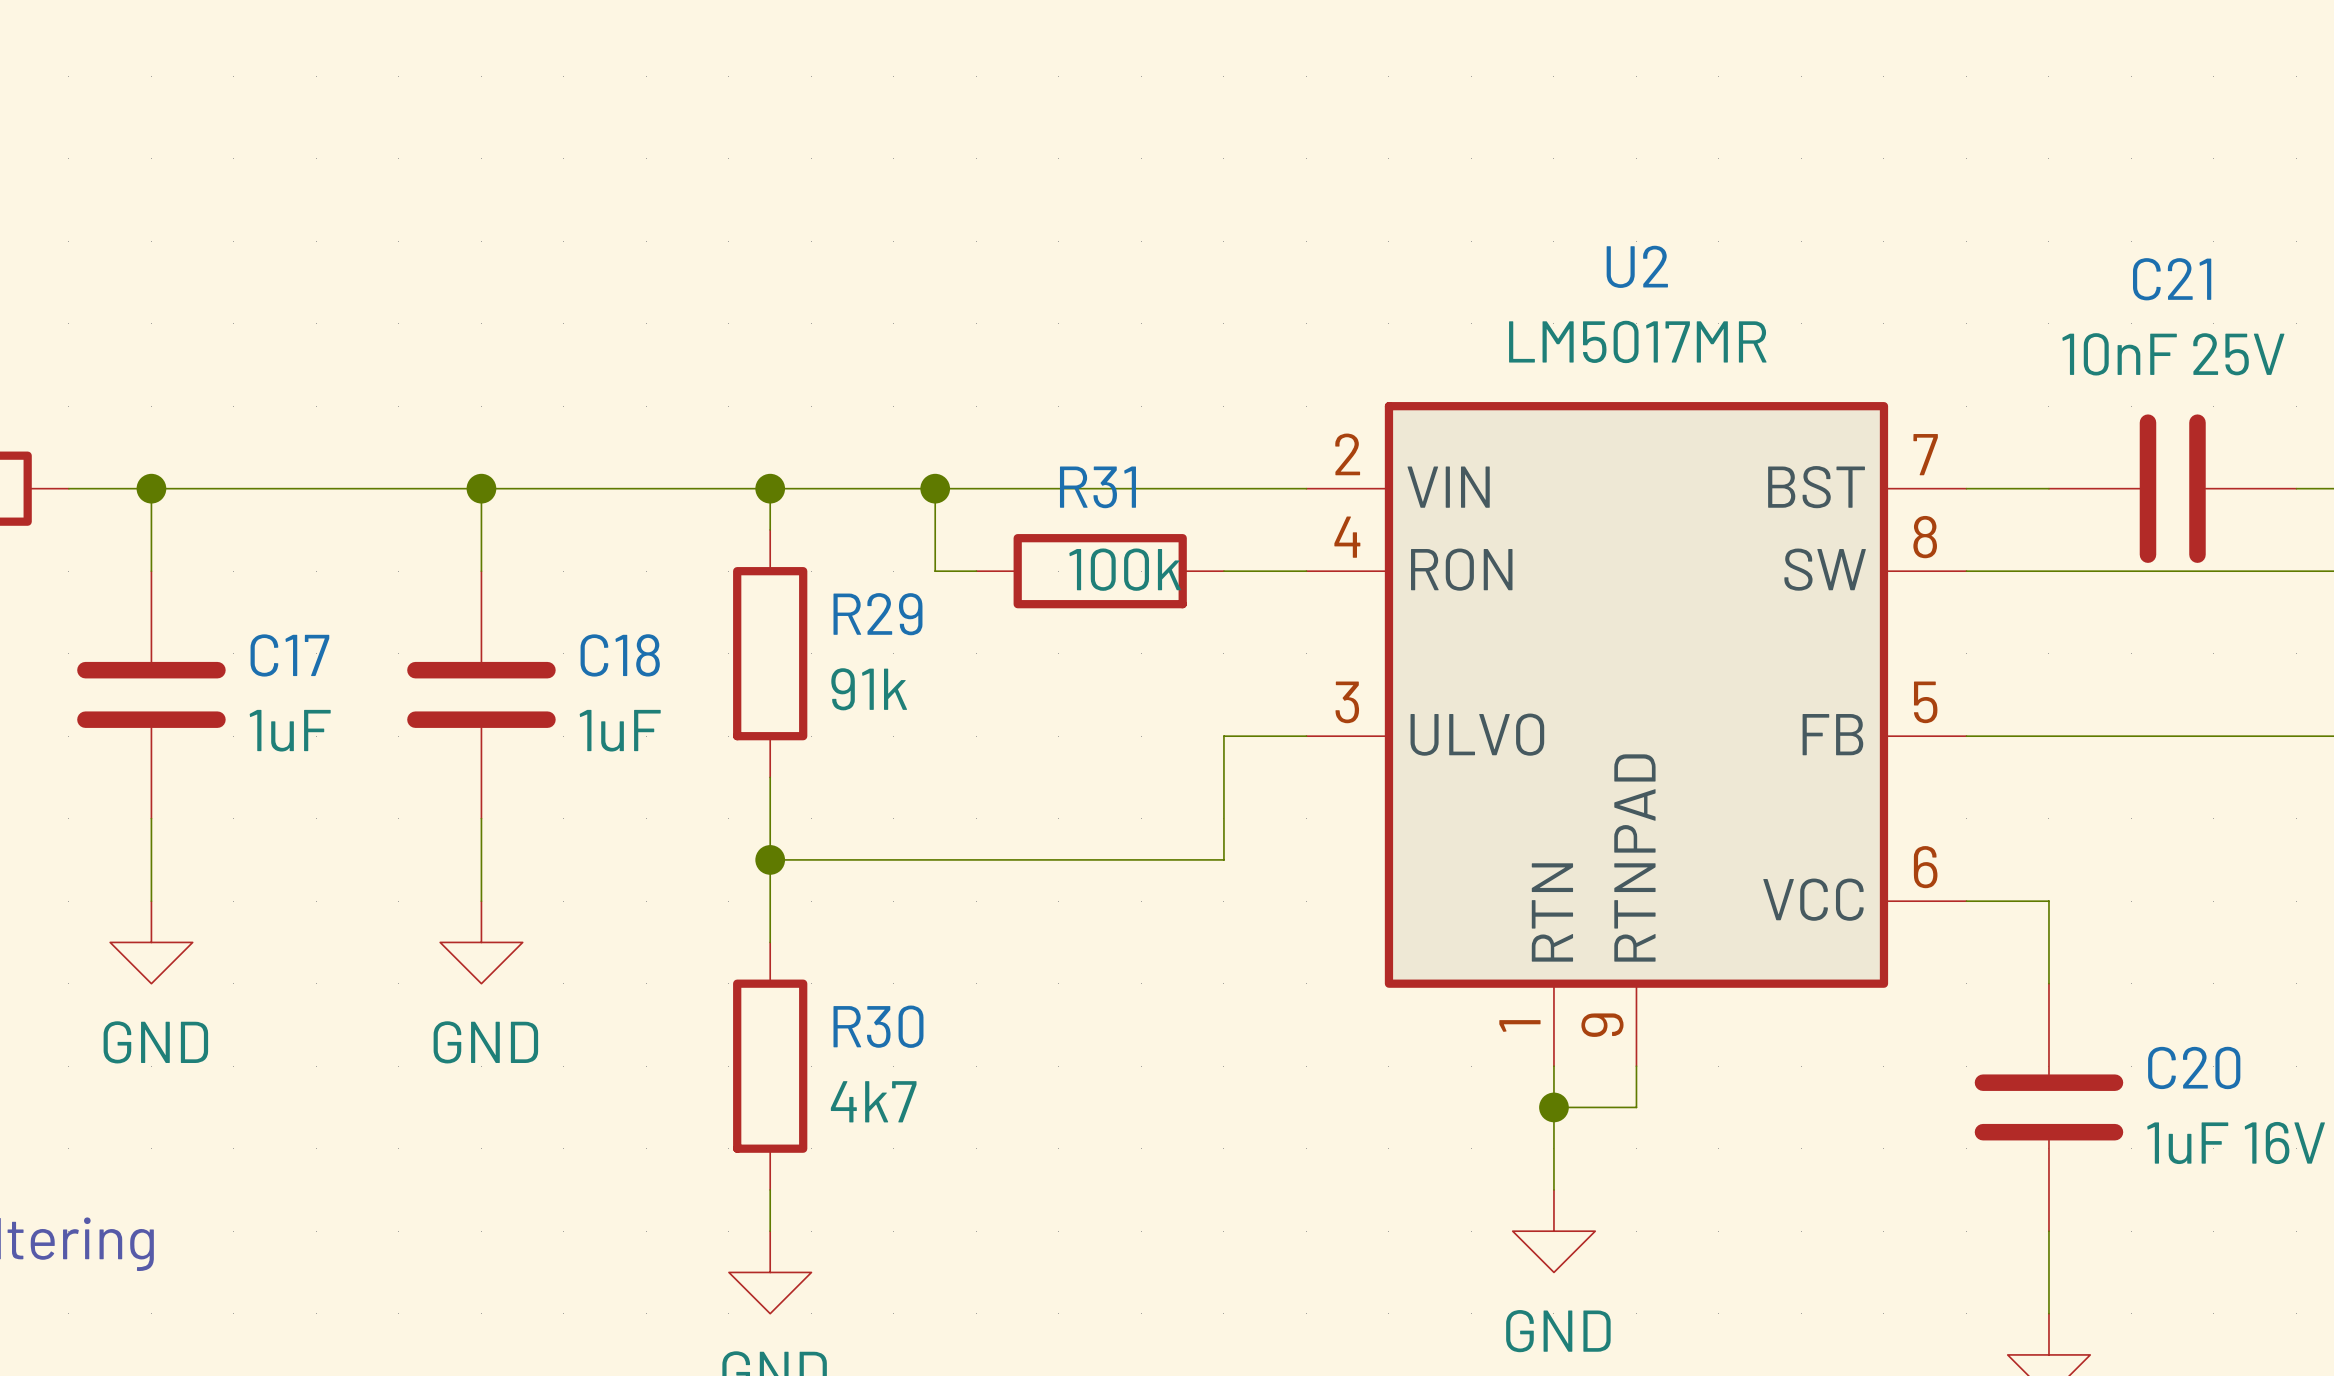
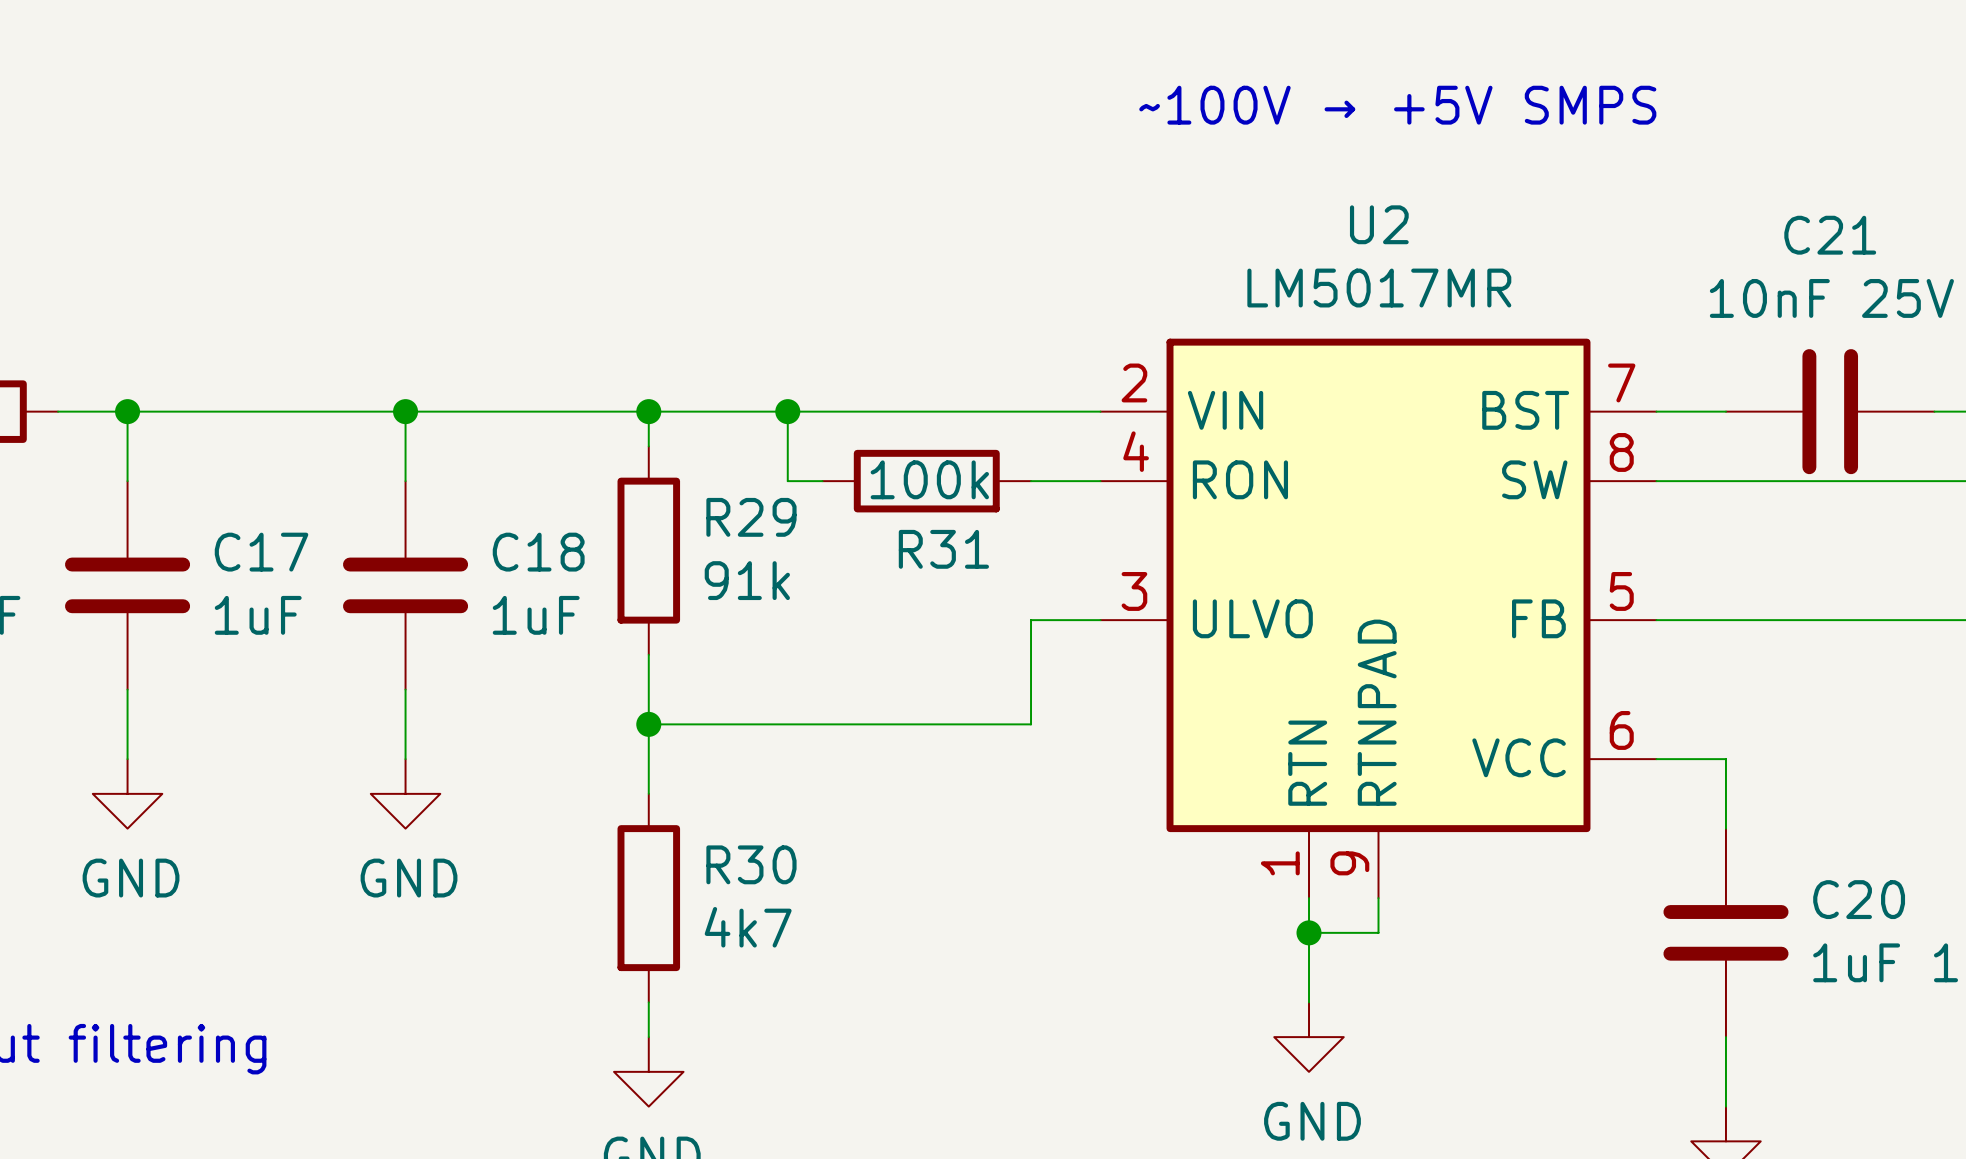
text: none -> ~100V → +5V SMPS (1397, 105)
R31 name position: R31 (1097, 487) -> R31 (943, 549)

